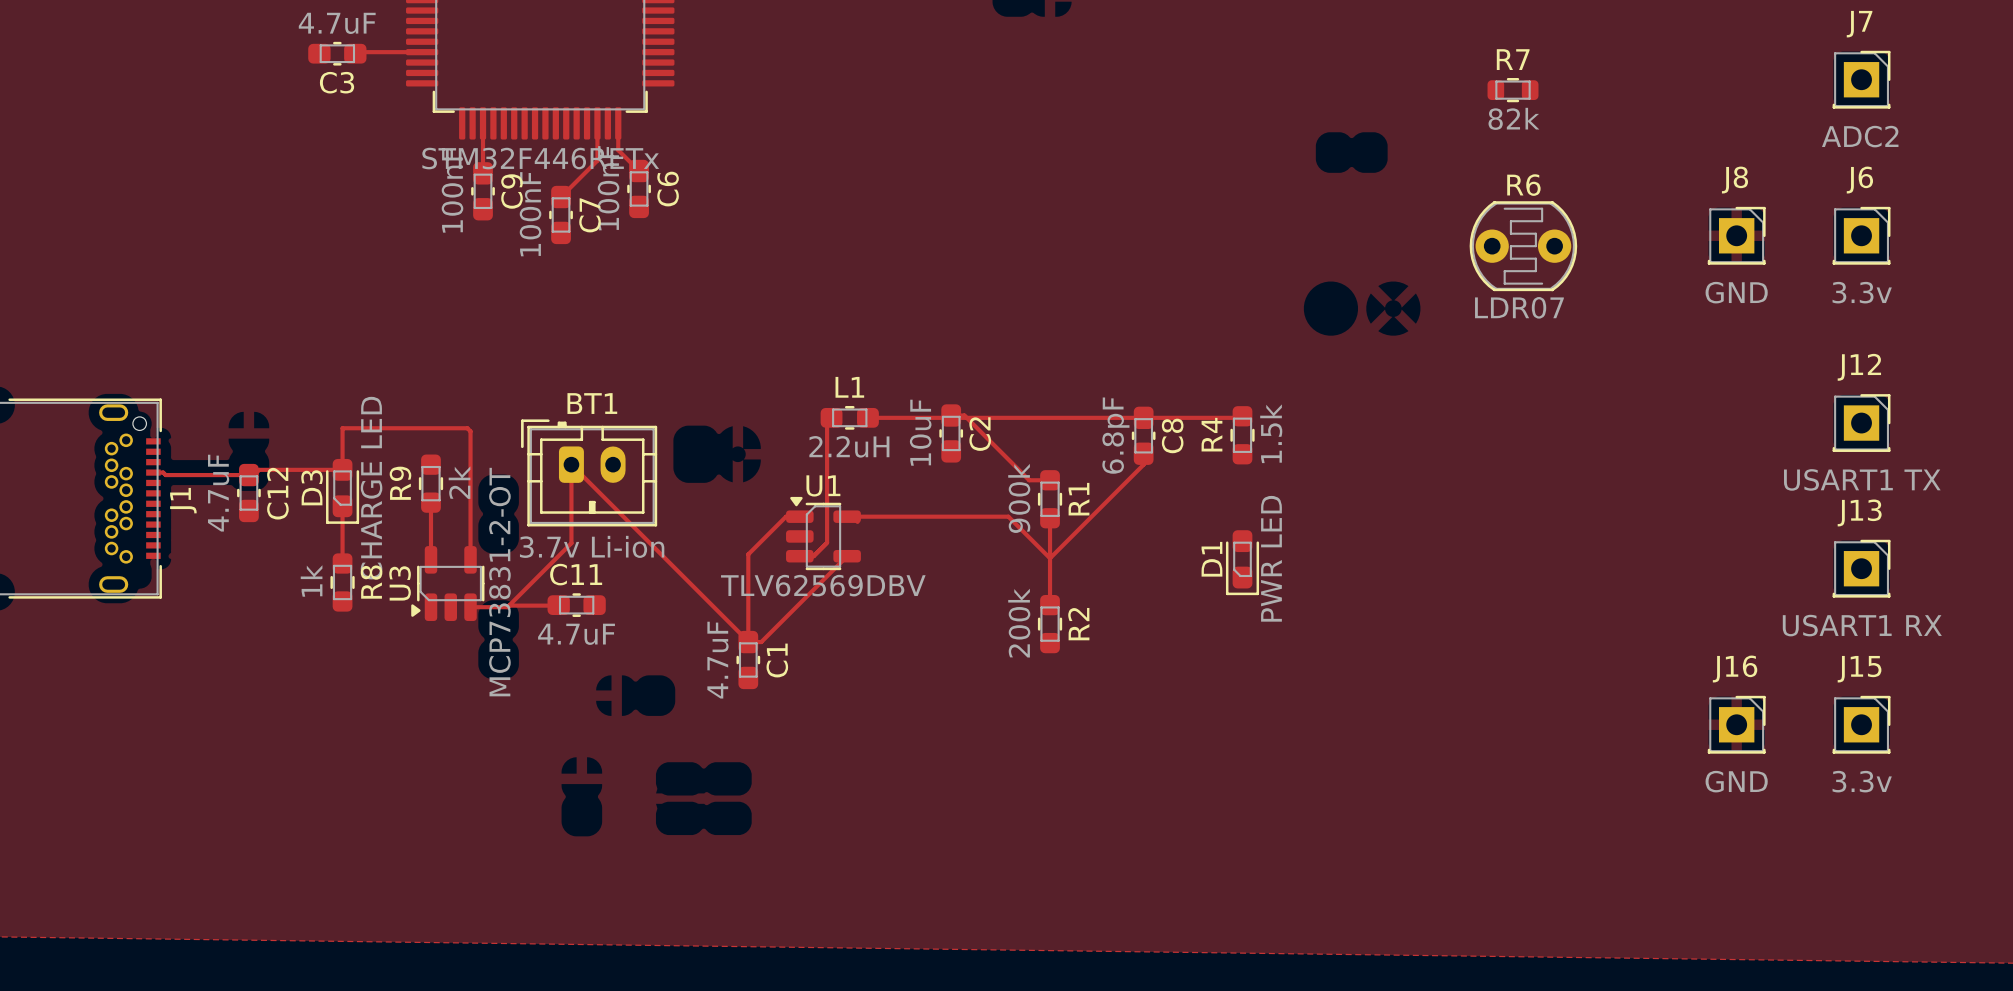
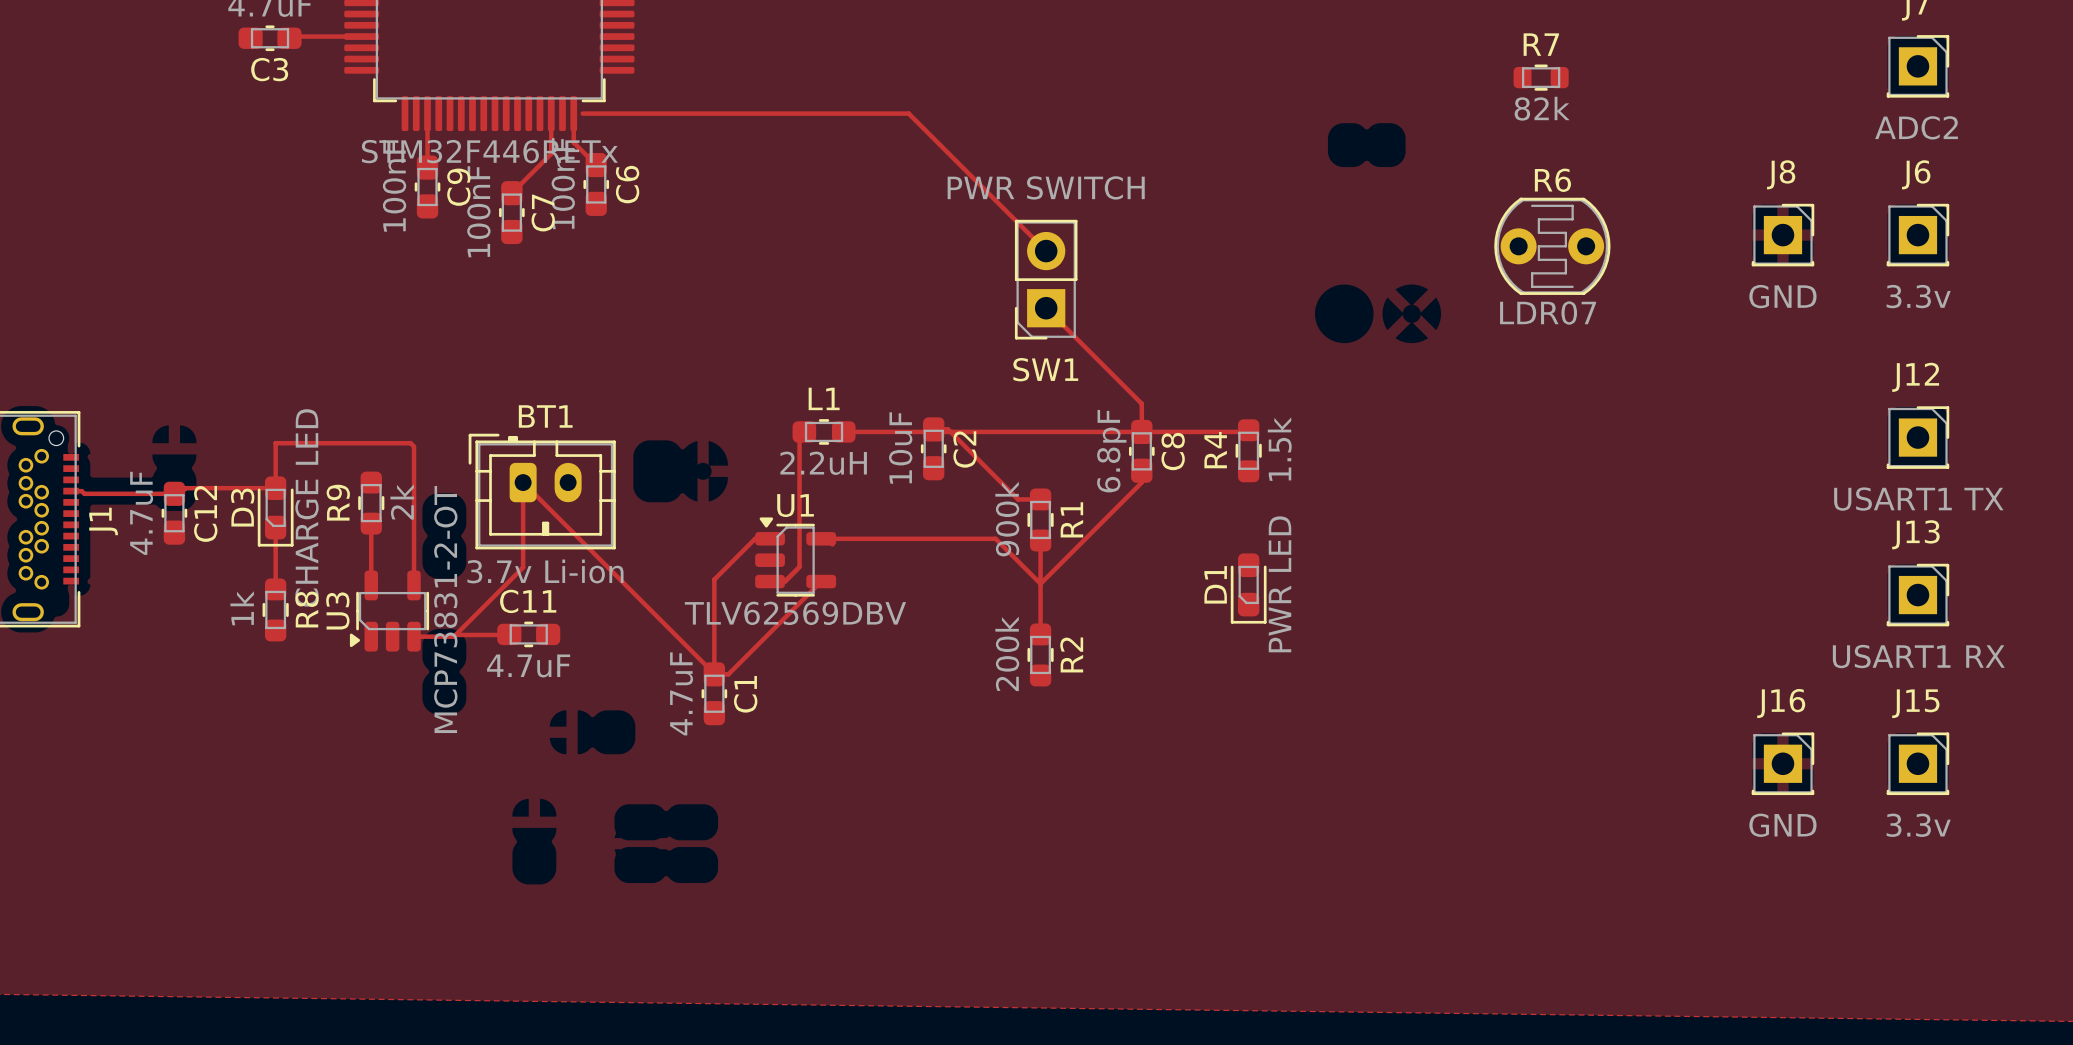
track: none -> (582, 113) (908, 113) (1046, 251)
SW1: none -> PWR SWITCH (1046, 279)
track: none -> (1046, 308) (1141, 403) (1141, 431)

